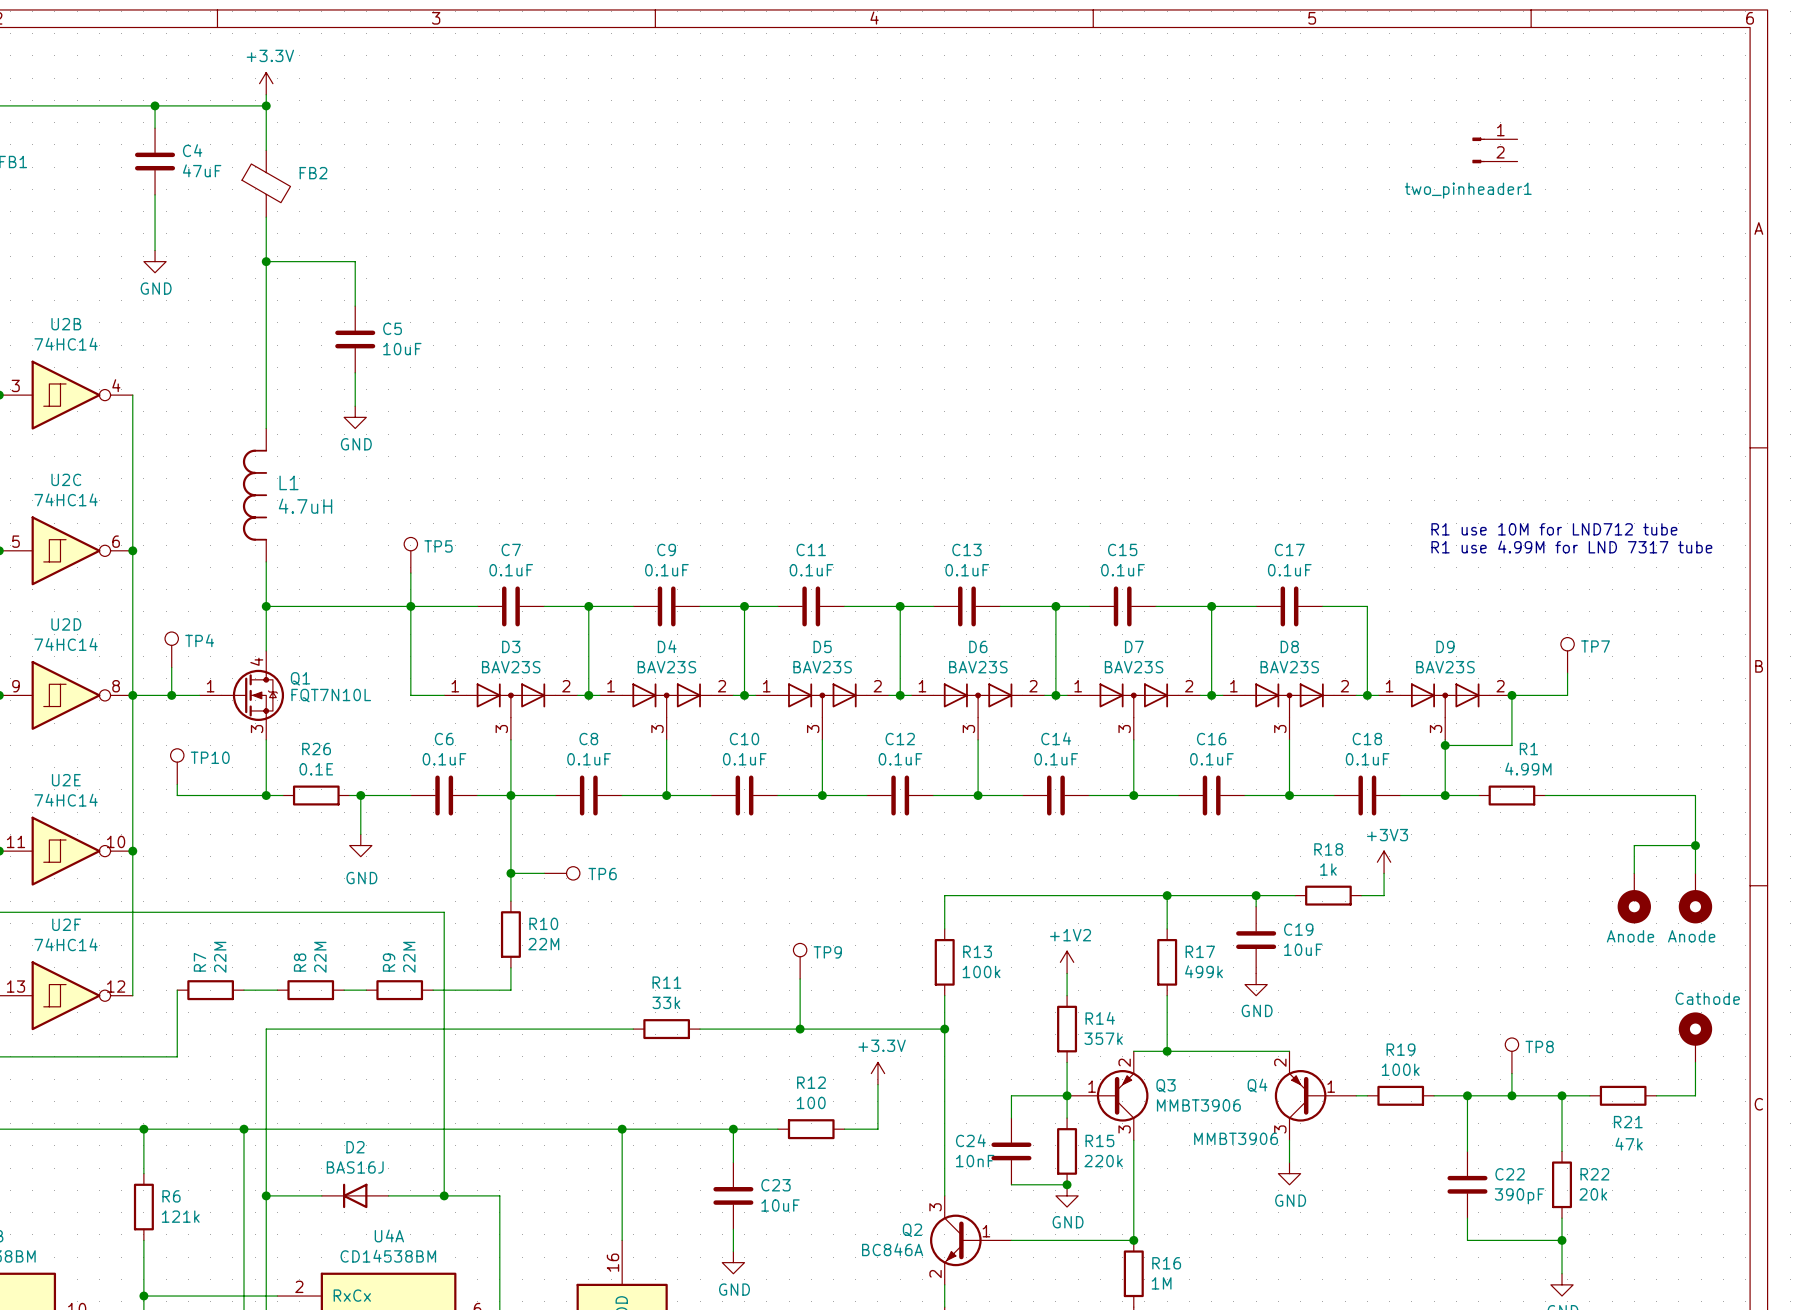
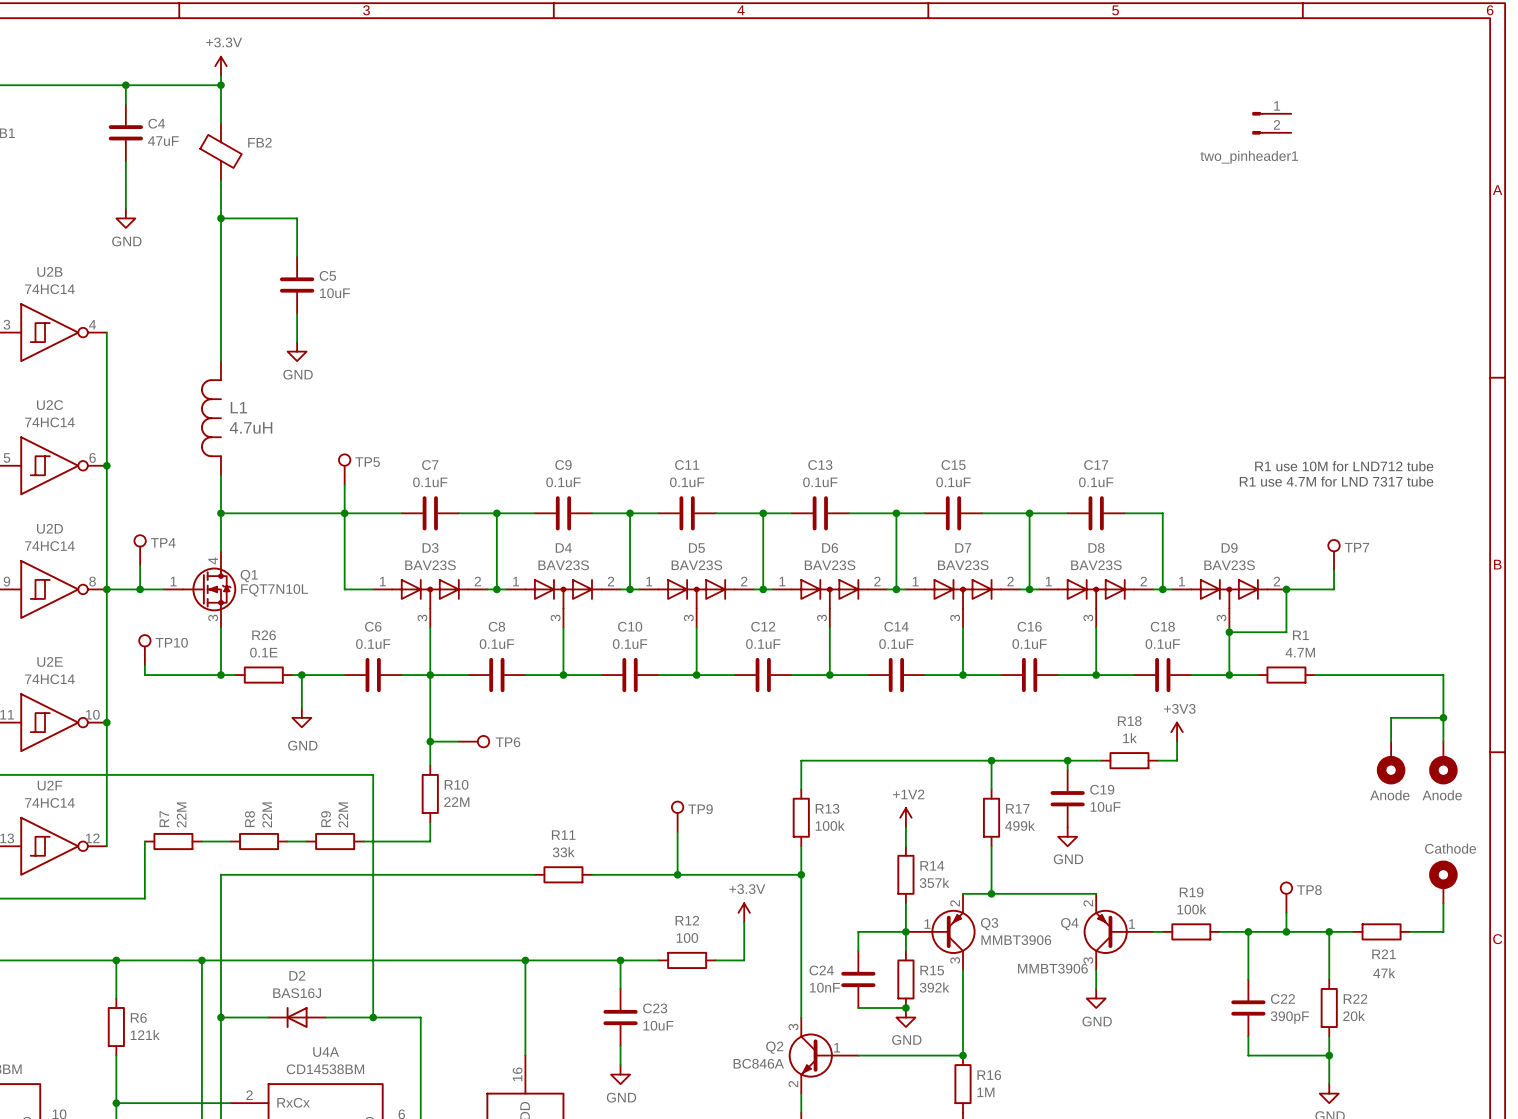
text: R1 use 10M for LND712 tube (1554, 529) -> none
text: R1 use 4.99M for LND 7317 tube (1571, 547) -> none
text: none -> R1 use 10M for LND712 tube (1344, 466)
text: none -> R1 use 4.7M for LND 7317 tube (1336, 481)
R1 value: 4.99M (1528, 769) -> 4.7M (1300, 652)
R15 value: 220k (1103, 1161) -> 392k (934, 987)

